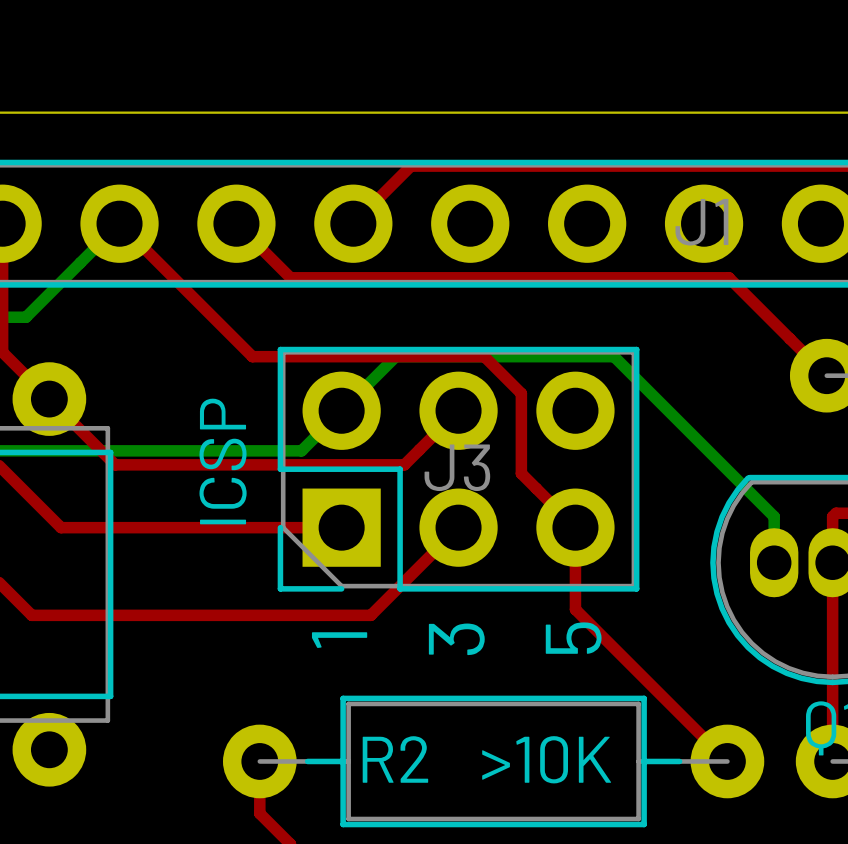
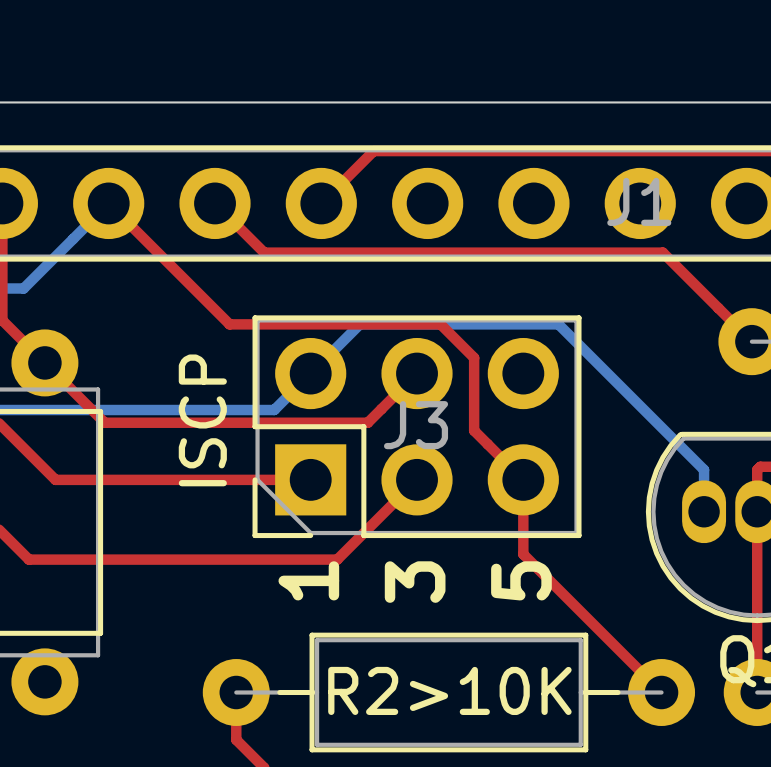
J3 value: ICSP (223, 461) -> ISCP (202, 420)
R2 name: R2 (395, 759) -> R2>10K (449, 690)
R2 value: >10K (546, 759) -> none

